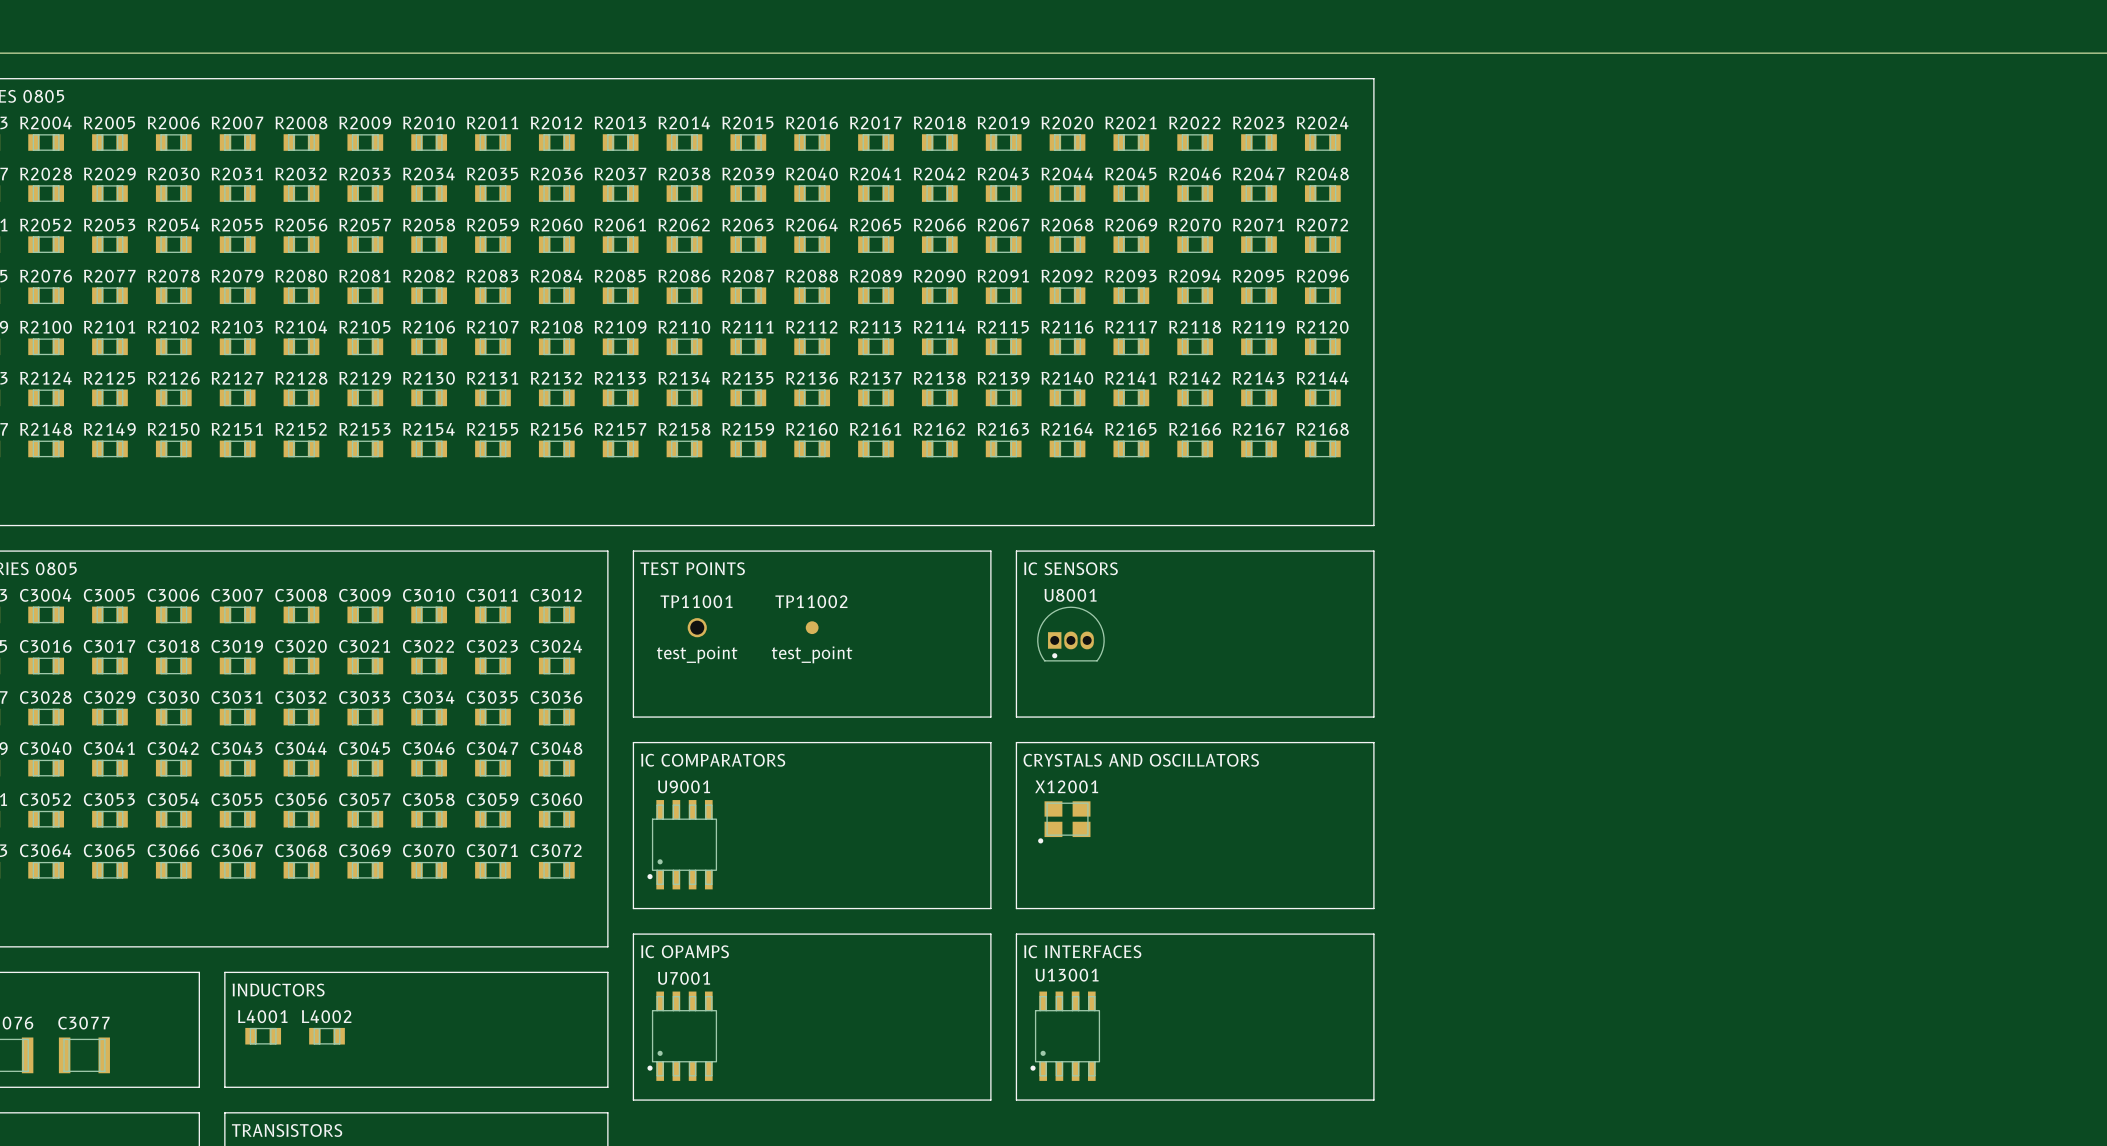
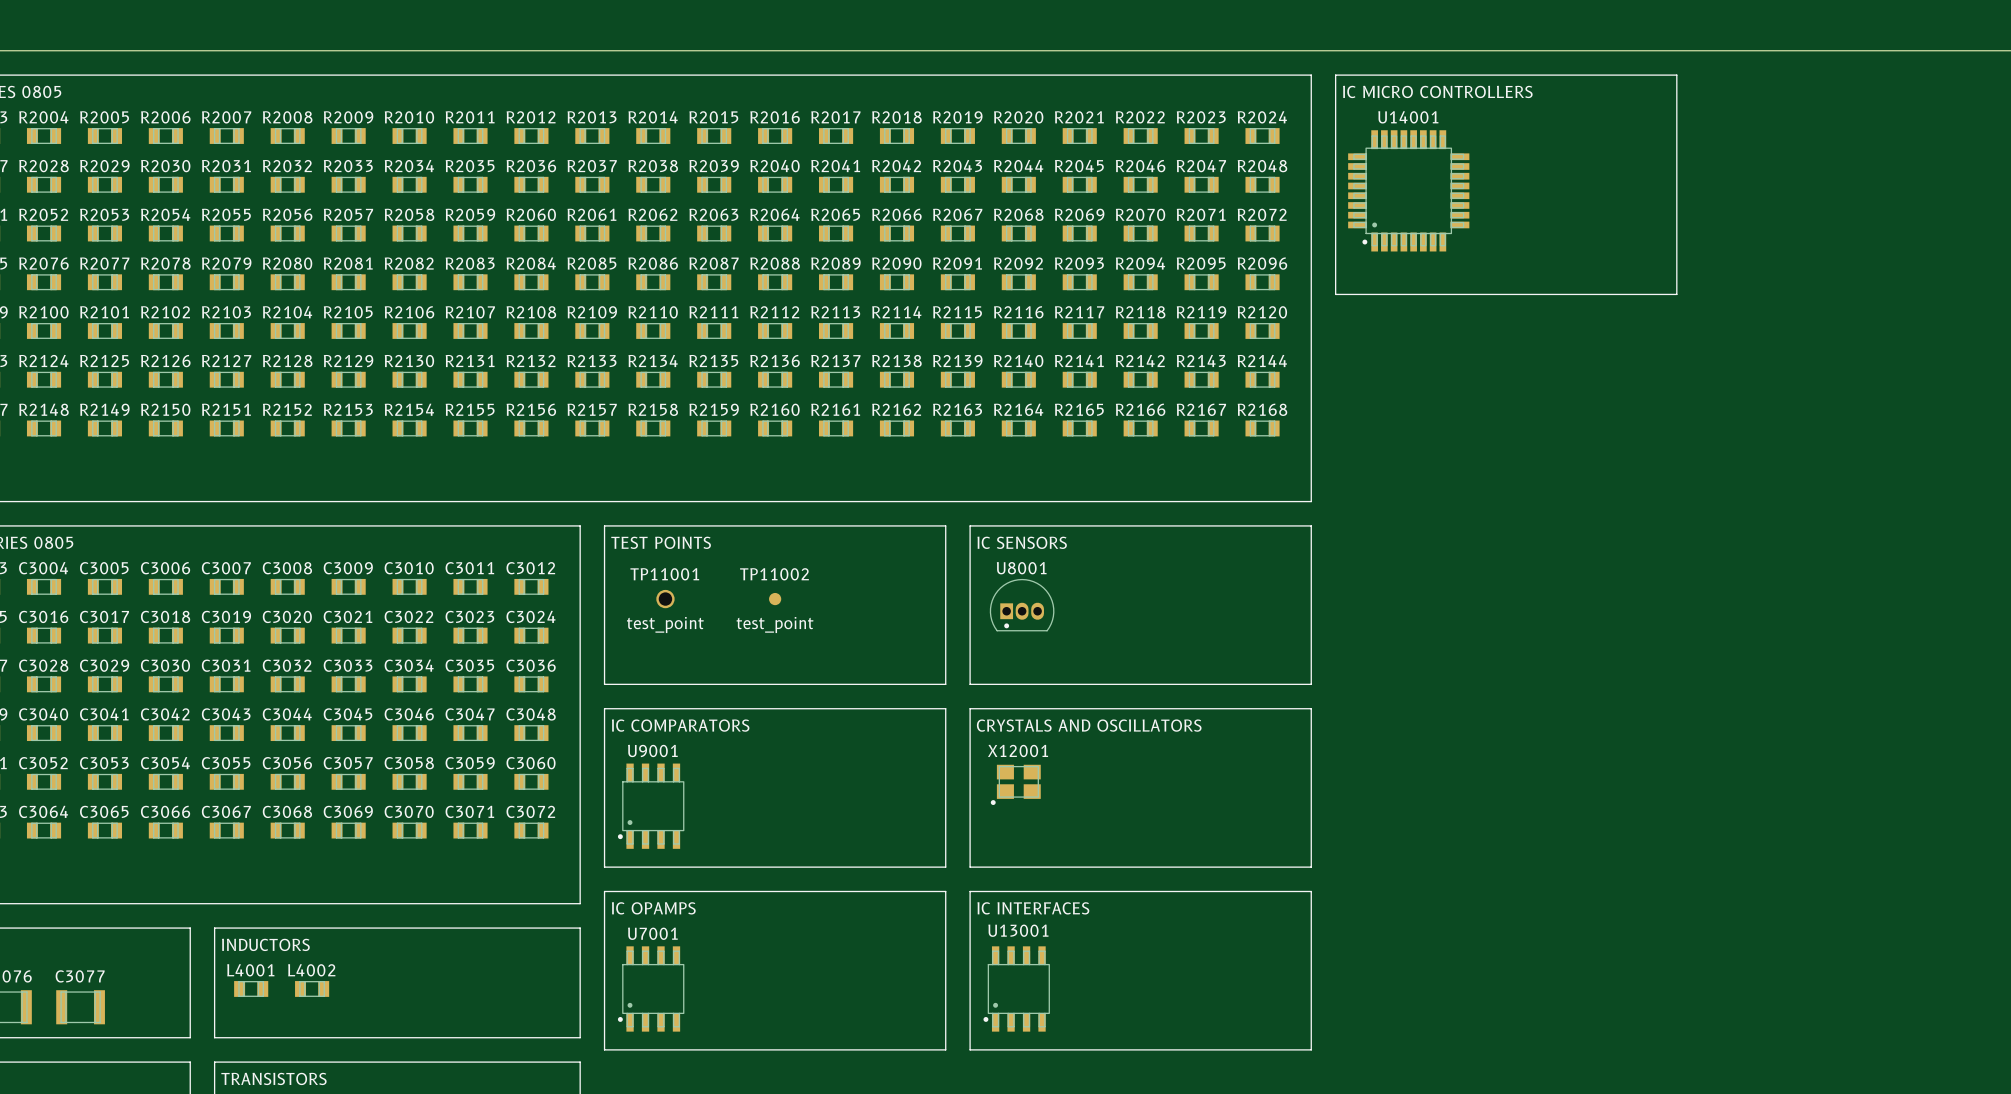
line: none -> (1335, 75) (1676, 75) (1676, 294) (1335, 294) (1335, 75)
text: none -> IC MICRO CONTROLLERS (1437, 91)
U14001: none -> (1408, 190)

